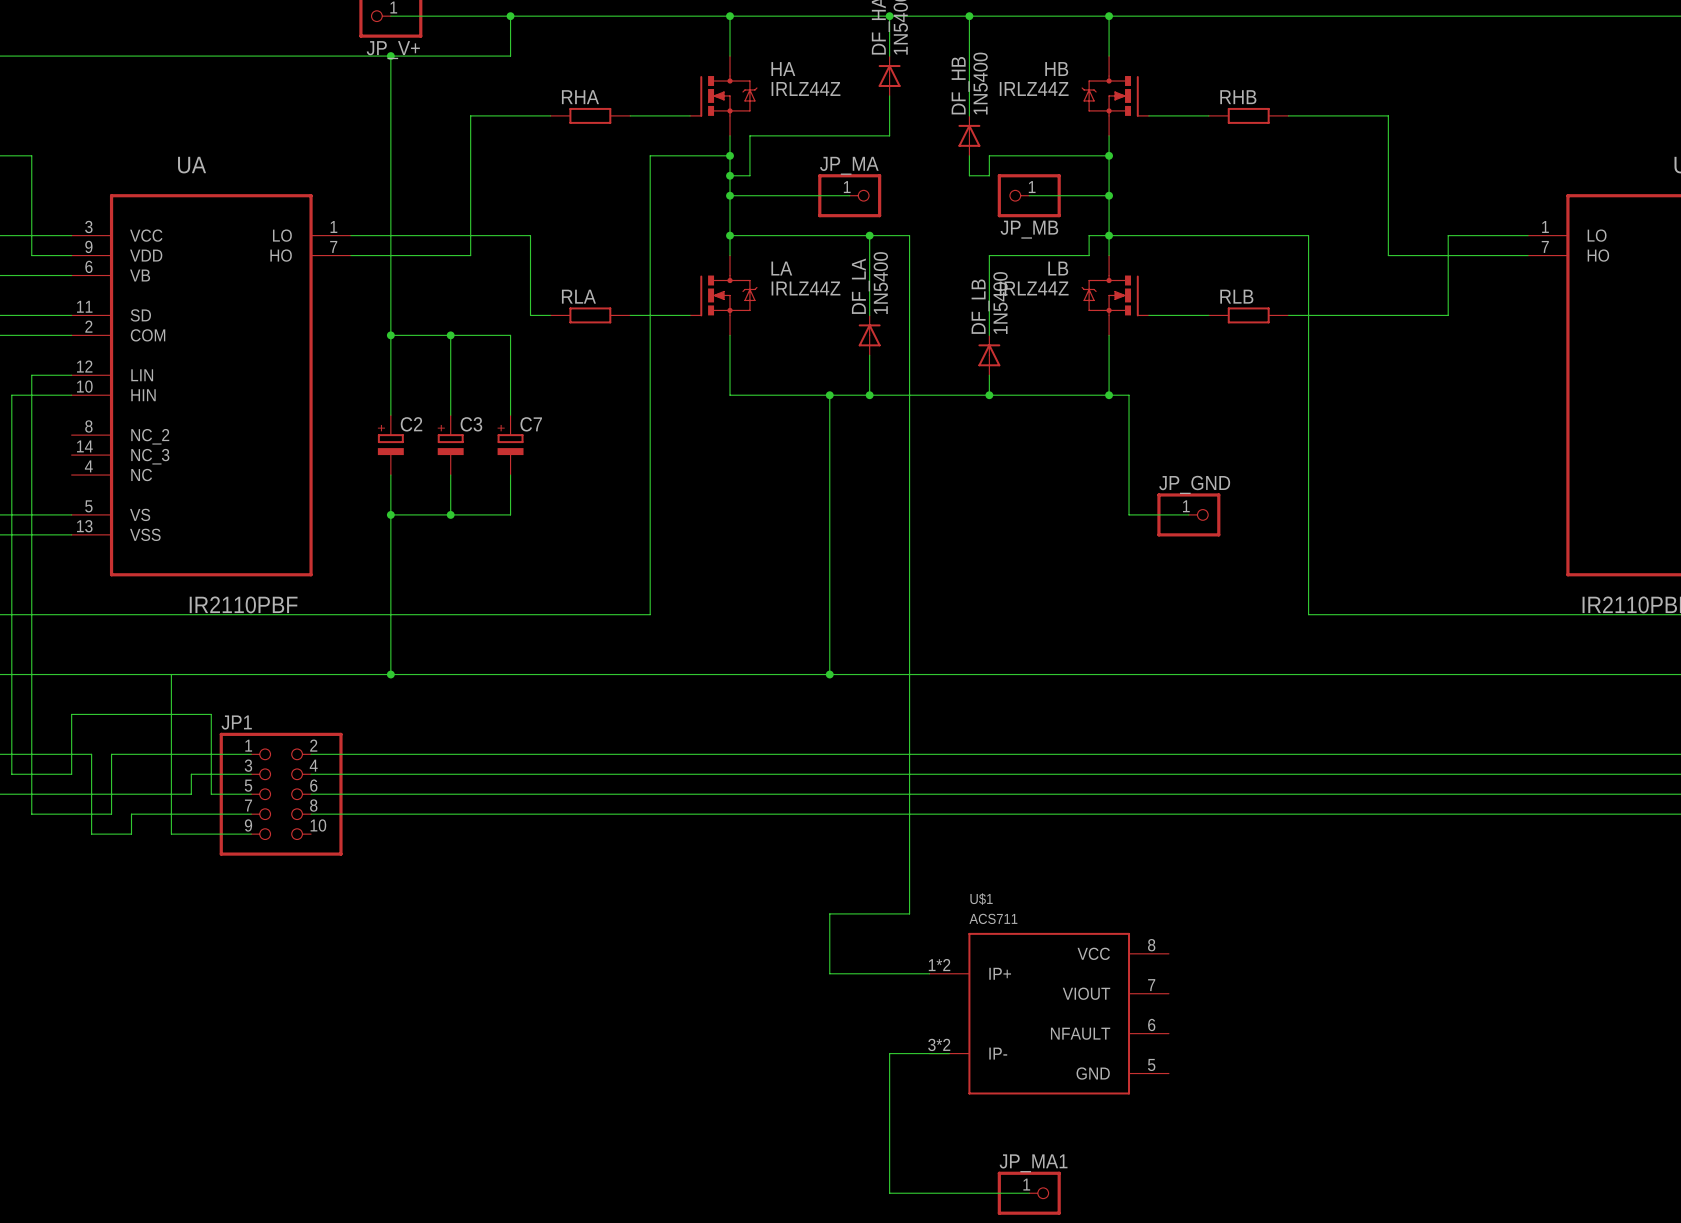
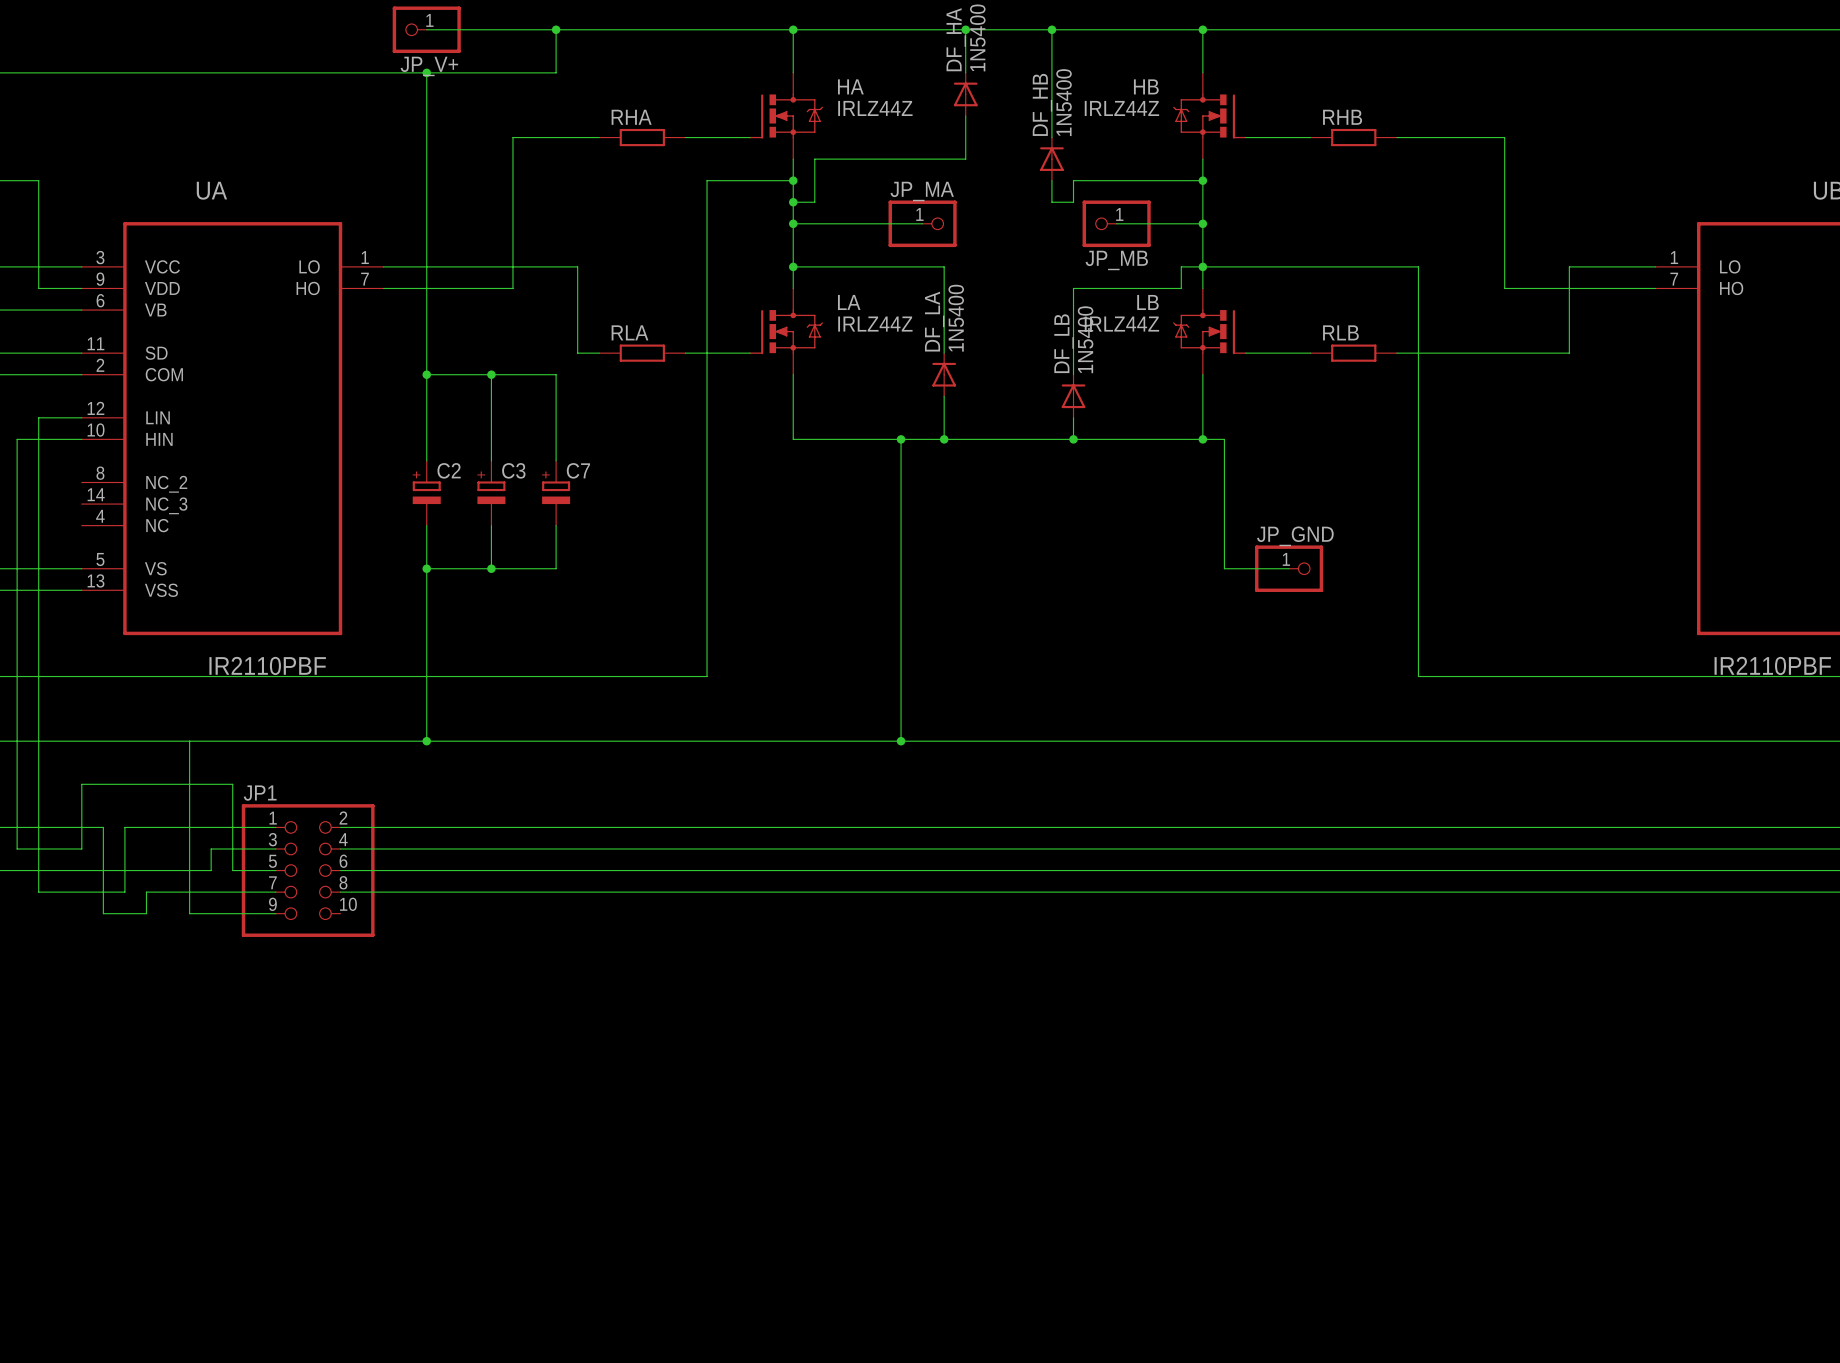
wire: (869, 235) (909, 235) (909, 913) (829, 913) (829, 973) (929, 973) -> none
junction: (869, 235) -> none
U$1: ACS711 (1049, 1013) -> none
wire: (949, 1053) (889, 1053) (889, 1193) (1029, 1193) -> none
JP_MA1: (1029, 1193) -> none

